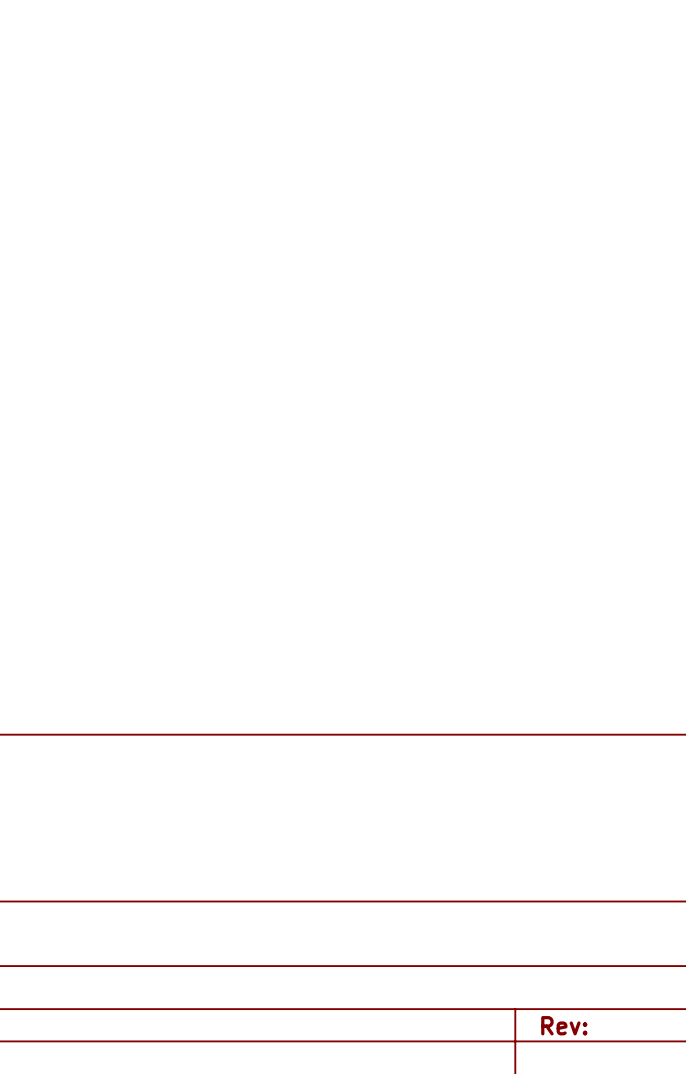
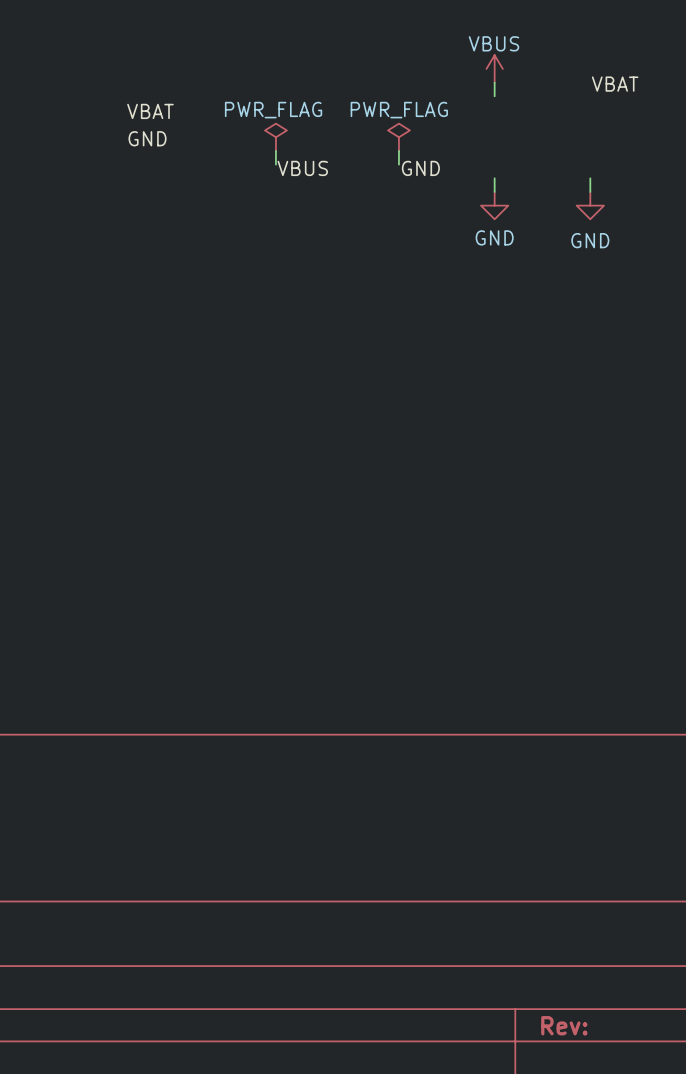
power symbol: none -> VBUS (494, 68)
wire: none -> (494, 82) (494, 96)
label: none -> VBAT (615, 84)
label: none -> VBAT (150, 111)
power symbol: none -> PWR_FLAG (275, 137)
power symbol: none -> PWR_FLAG (398, 137)
label: none -> GND (147, 138)
wire: none -> (275, 150) (275, 164)
wire: none -> (398, 150) (398, 164)
label: none -> VBUS (302, 168)
label: none -> GND (420, 168)
wire: none -> (494, 178) (494, 191)
wire: none -> (590, 178) (590, 191)
power symbol: none -> GND (494, 205)
power symbol: none -> GND (590, 205)

